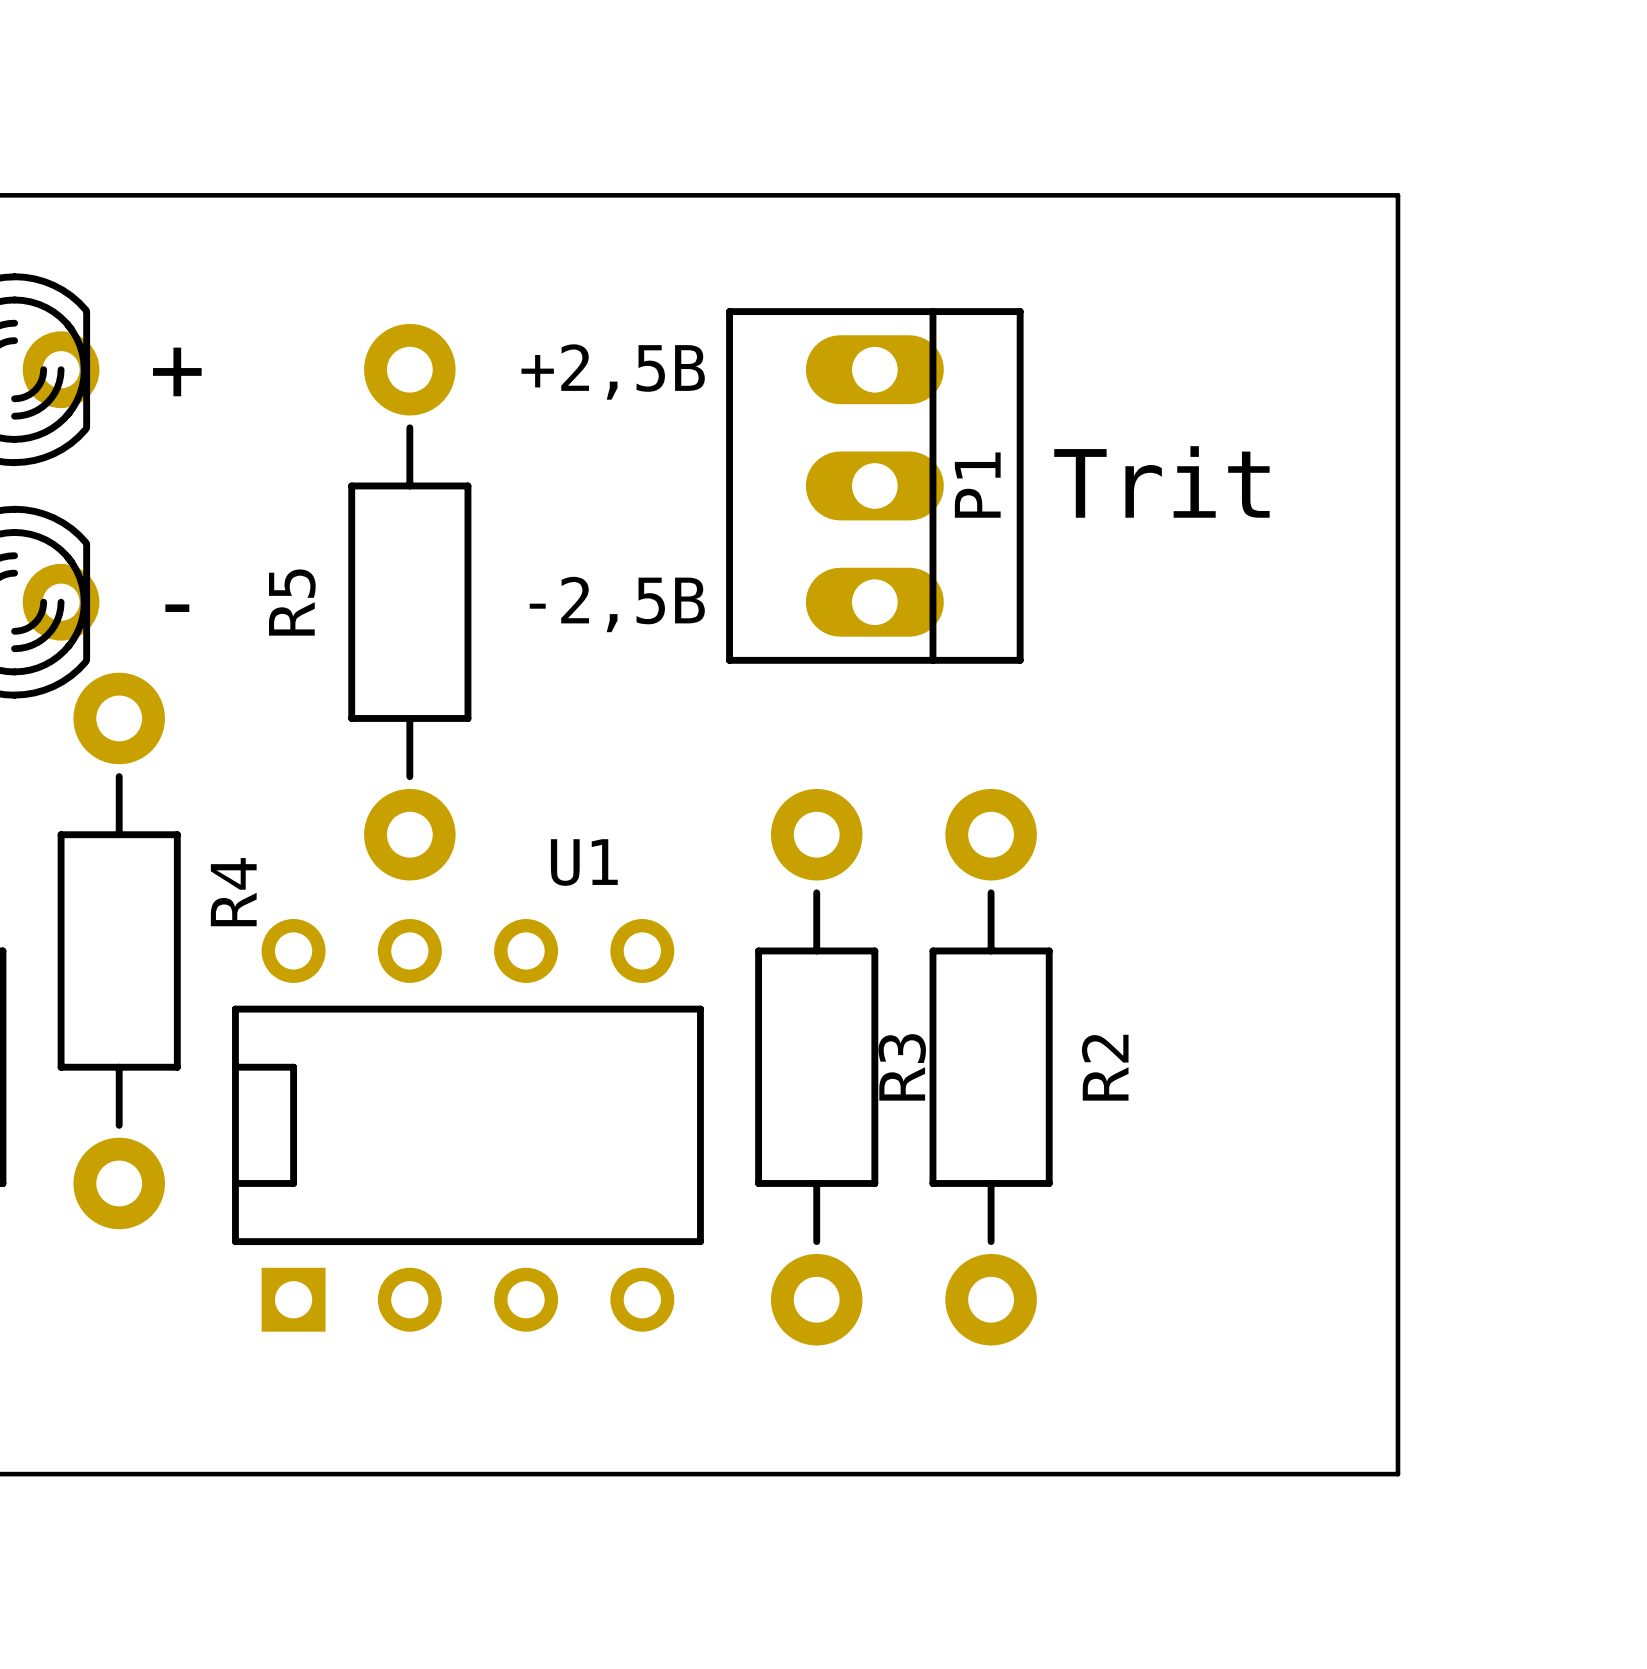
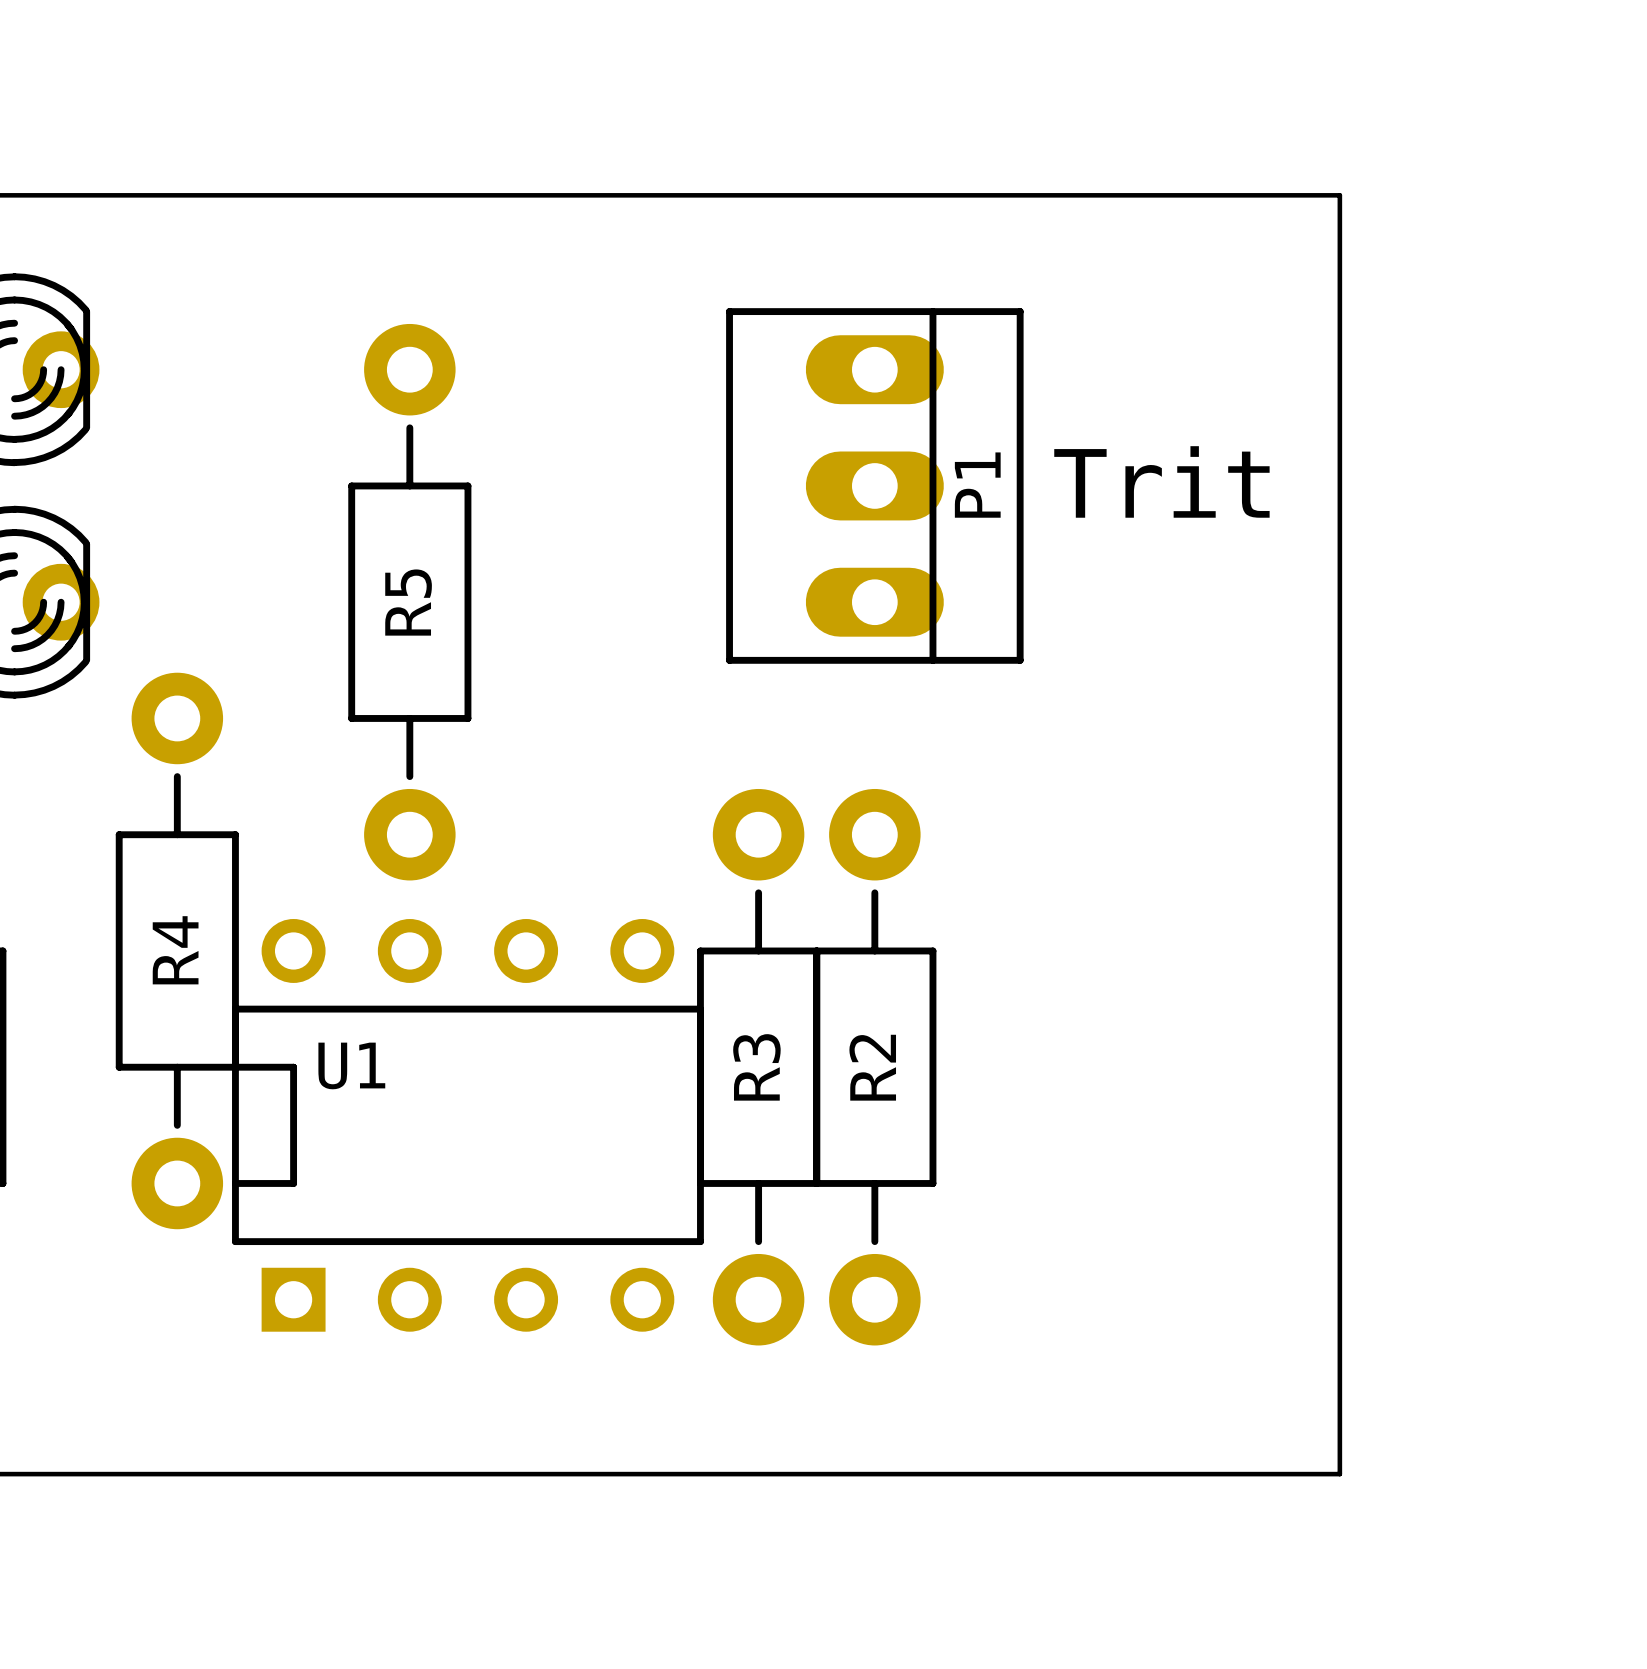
board edge: (1339, 195) (1397, 195) (1397, 1474) (1339, 1474) -> (1339, 195) (1339, 1474)
text: + (177, 371) -> none
text: +2,5В (613, 371) -> none
R5 name position: R5 (292, 602) -> R5 (408, 602)
text: -2,5В (617, 604) -> none
text: - (177, 608) -> none
U1 name position: U1 (584, 862) -> U1 (351, 1065)
R4 name position: R4 (233, 892) -> R4 (175, 950)
R4 position: (119, 950) -> (177, 950)
R3 position: (816, 1067) -> (758, 1067)
R3 name position: R3 (902, 1067) -> R3 (756, 1067)
R2 position: (991, 1067) -> (874, 1067)
R2 name position: R2 (1105, 1067) -> R2 (872, 1067)

